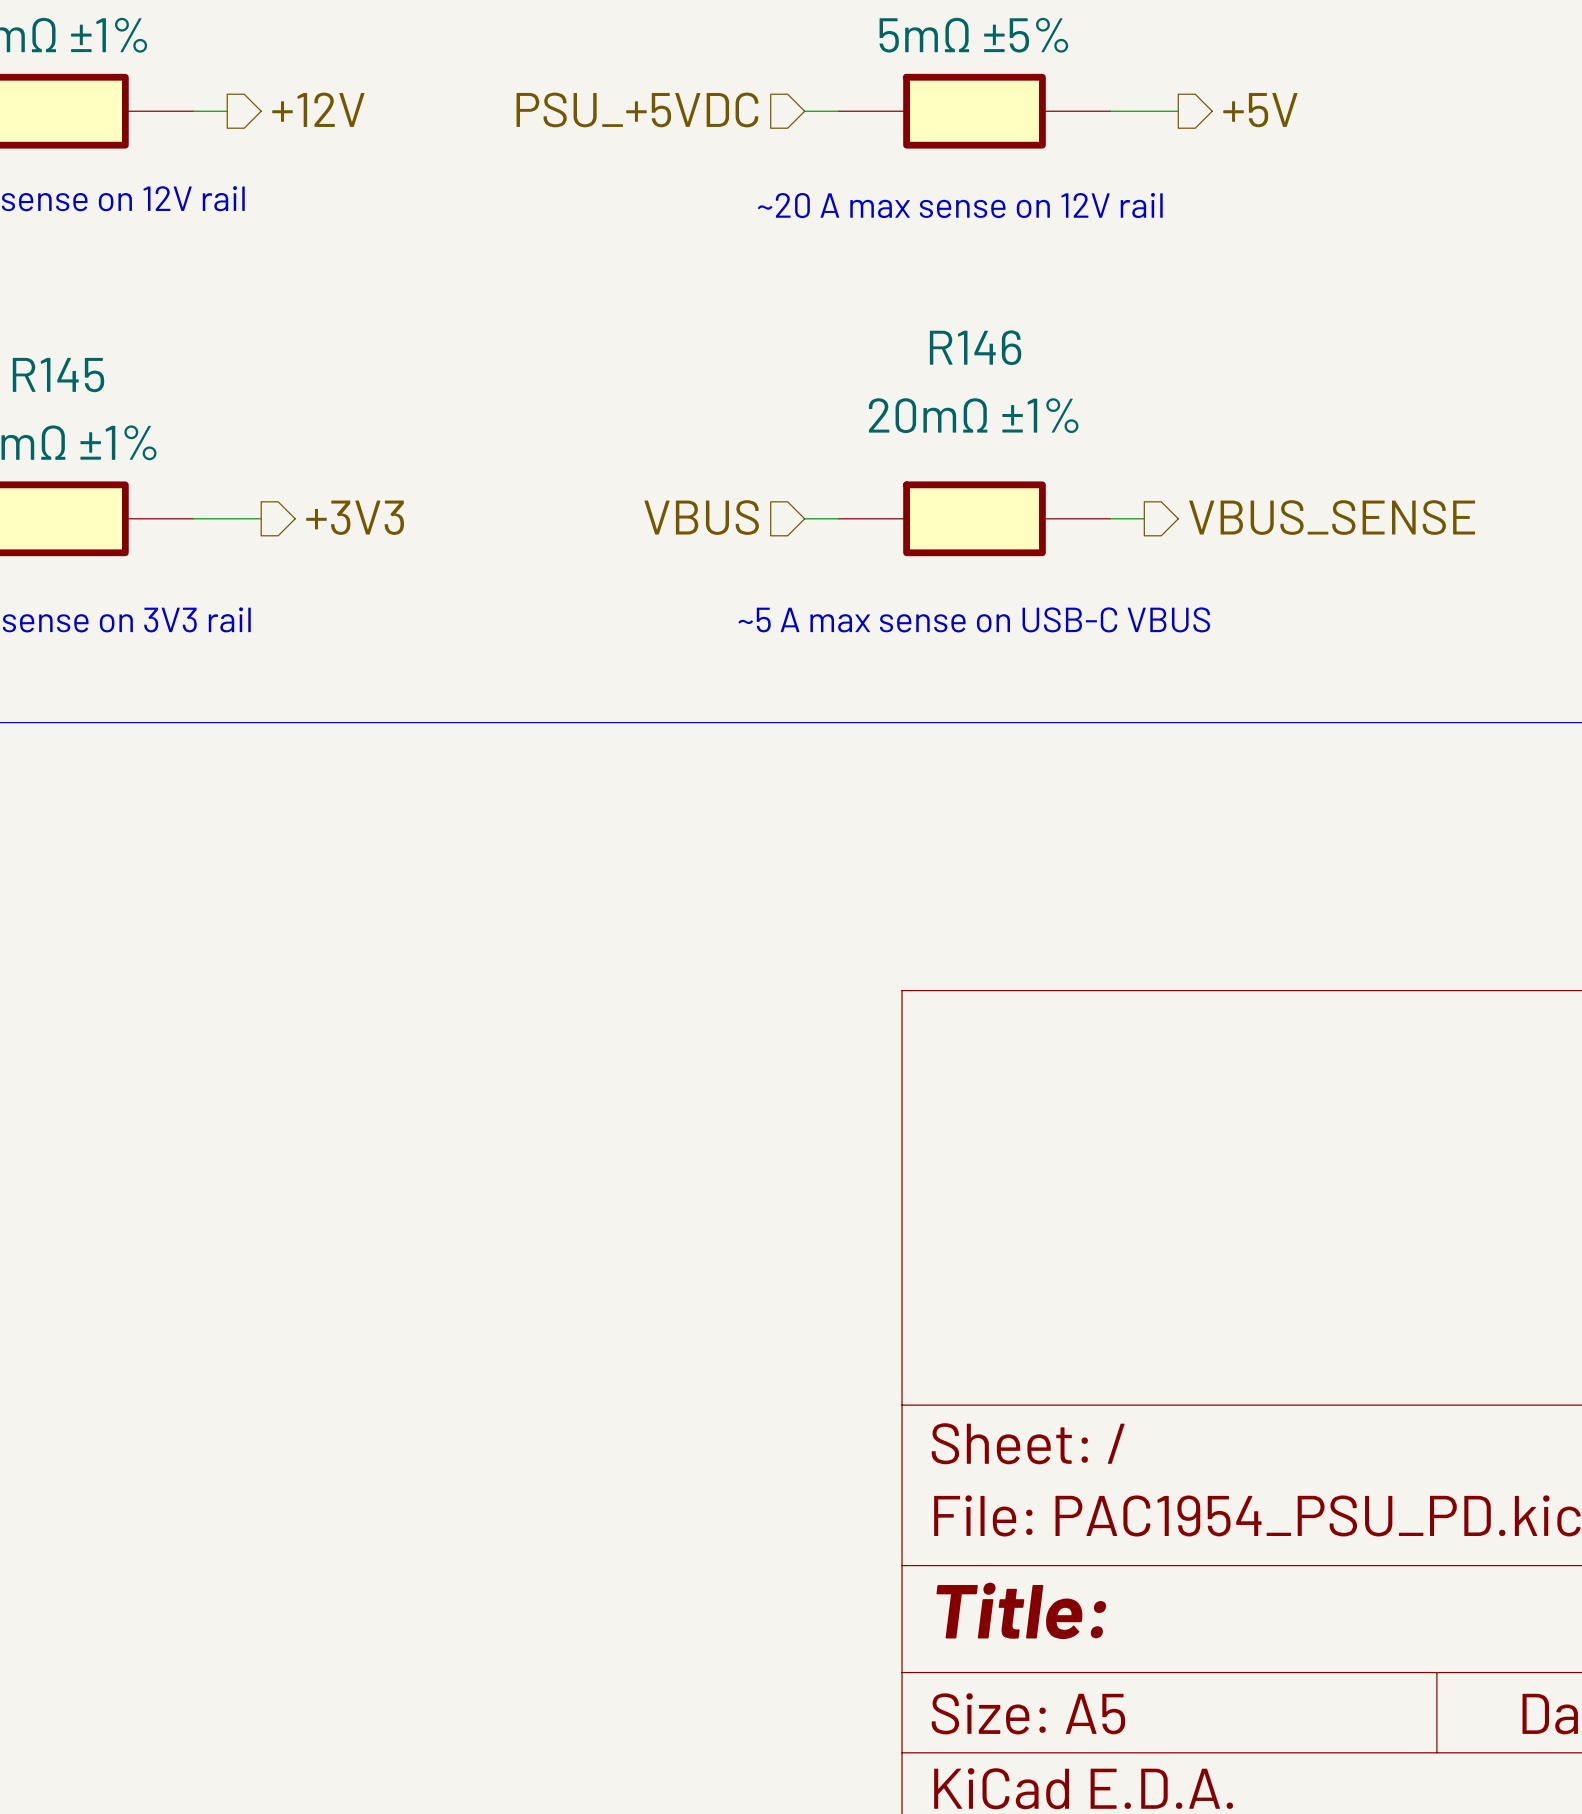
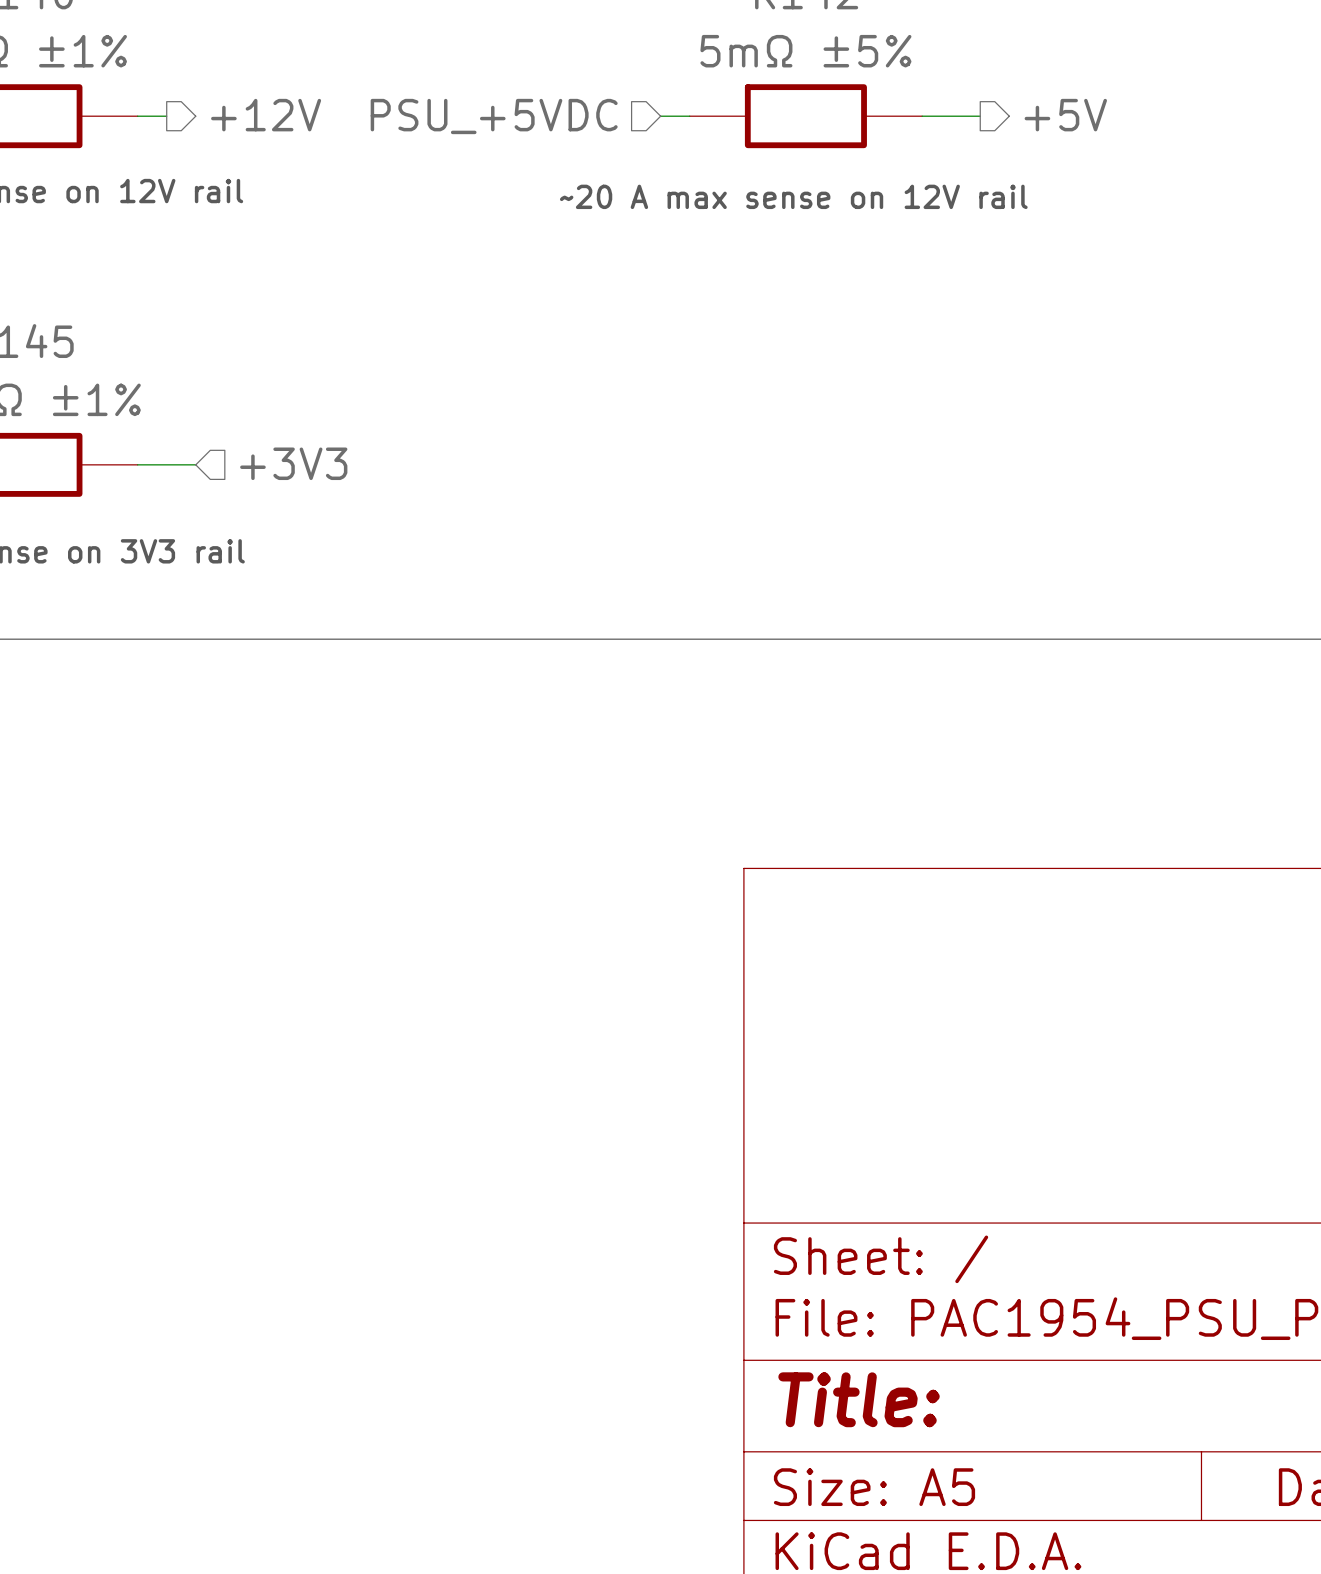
hierarchical label shape: output (355, 517) -> input (293, 463)
hierarchical label: VBUS (701, 517) -> none
hierarchical label: VBUS_SENSE (1332, 517) -> none
wire: (804, 518) (838, 518) -> none
R146: 20mΩ ±1% (974, 518) -> none
wire: (1110, 518) (1144, 518) -> none
text: ~5 A max sense on USB-C VBUS (974, 619) -> none

